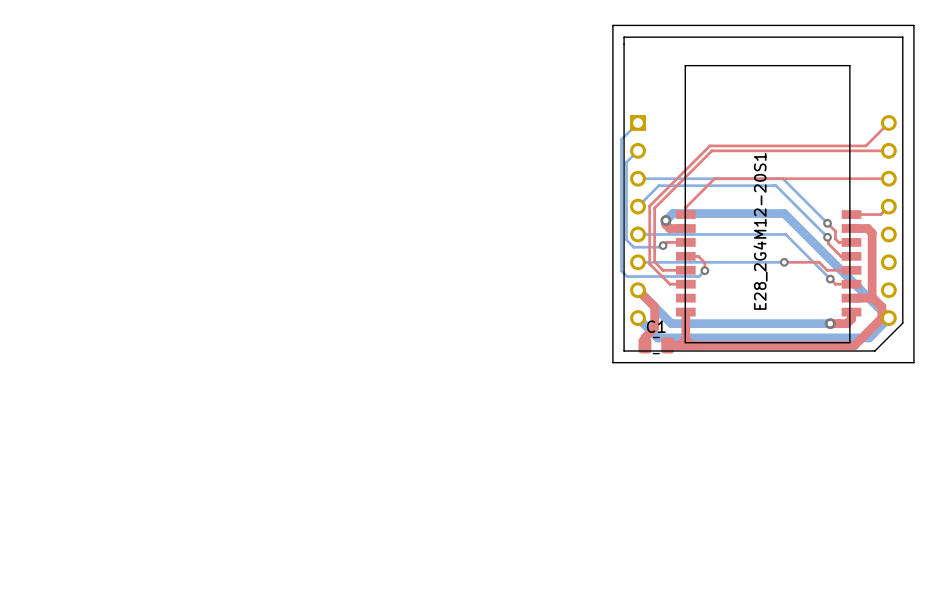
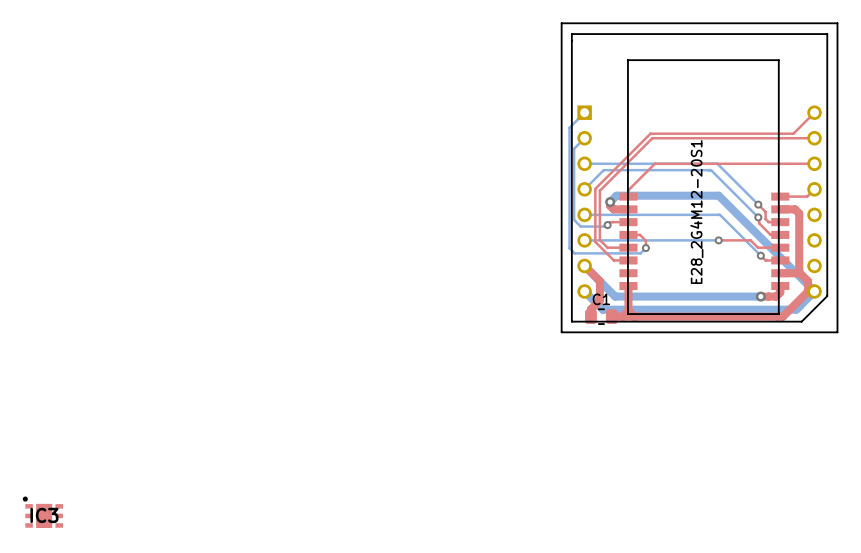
IC3: none -> (42, 512)

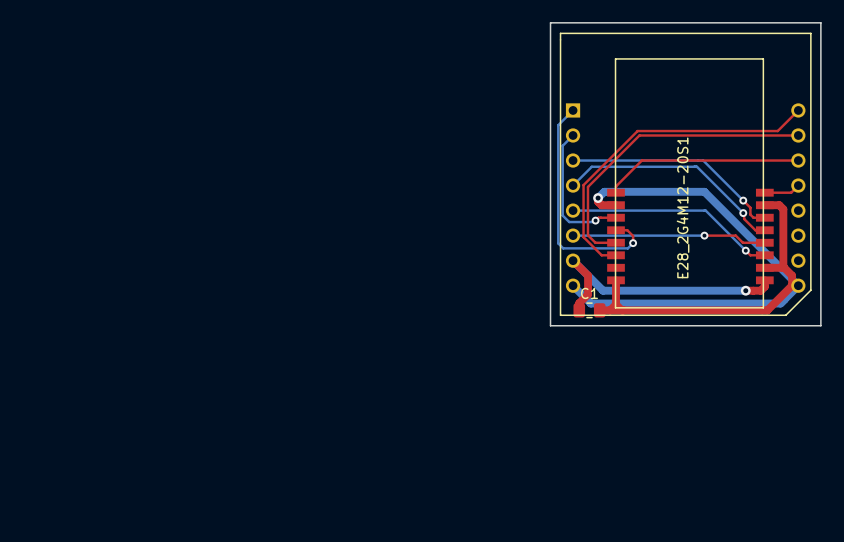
IC3: (42, 512) -> none

